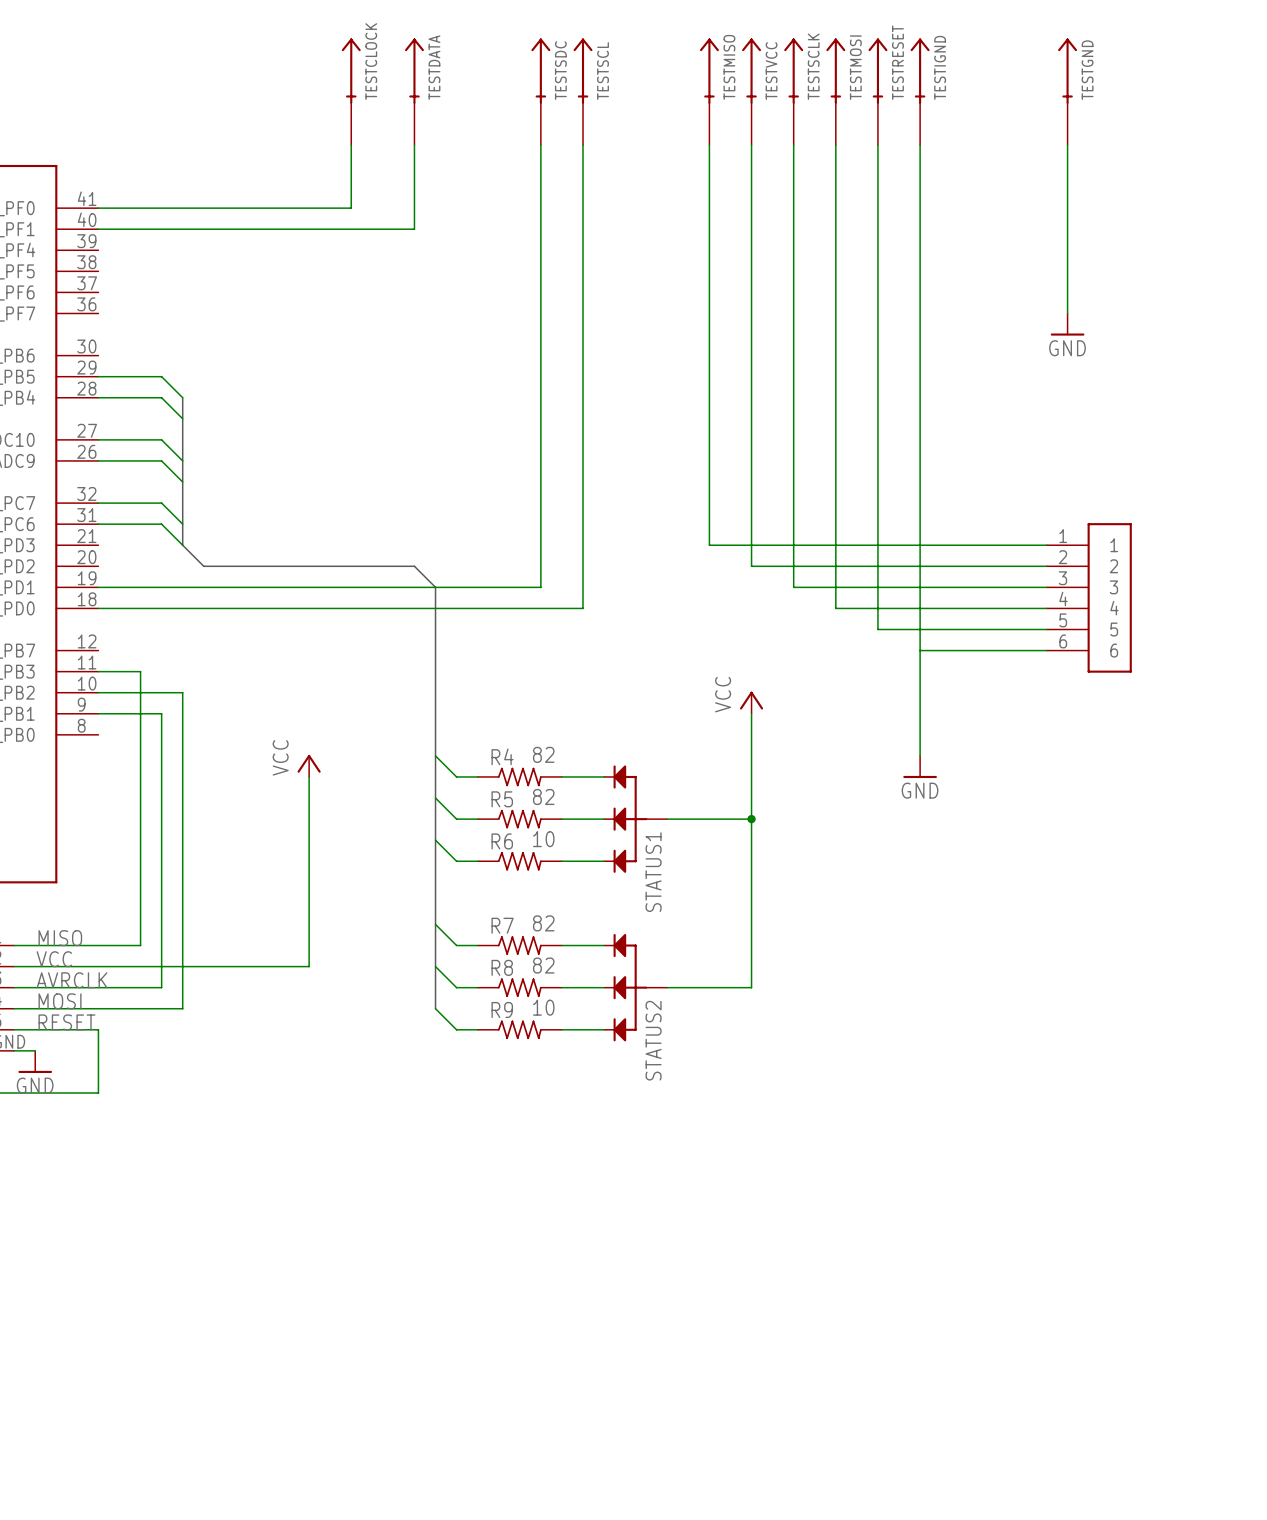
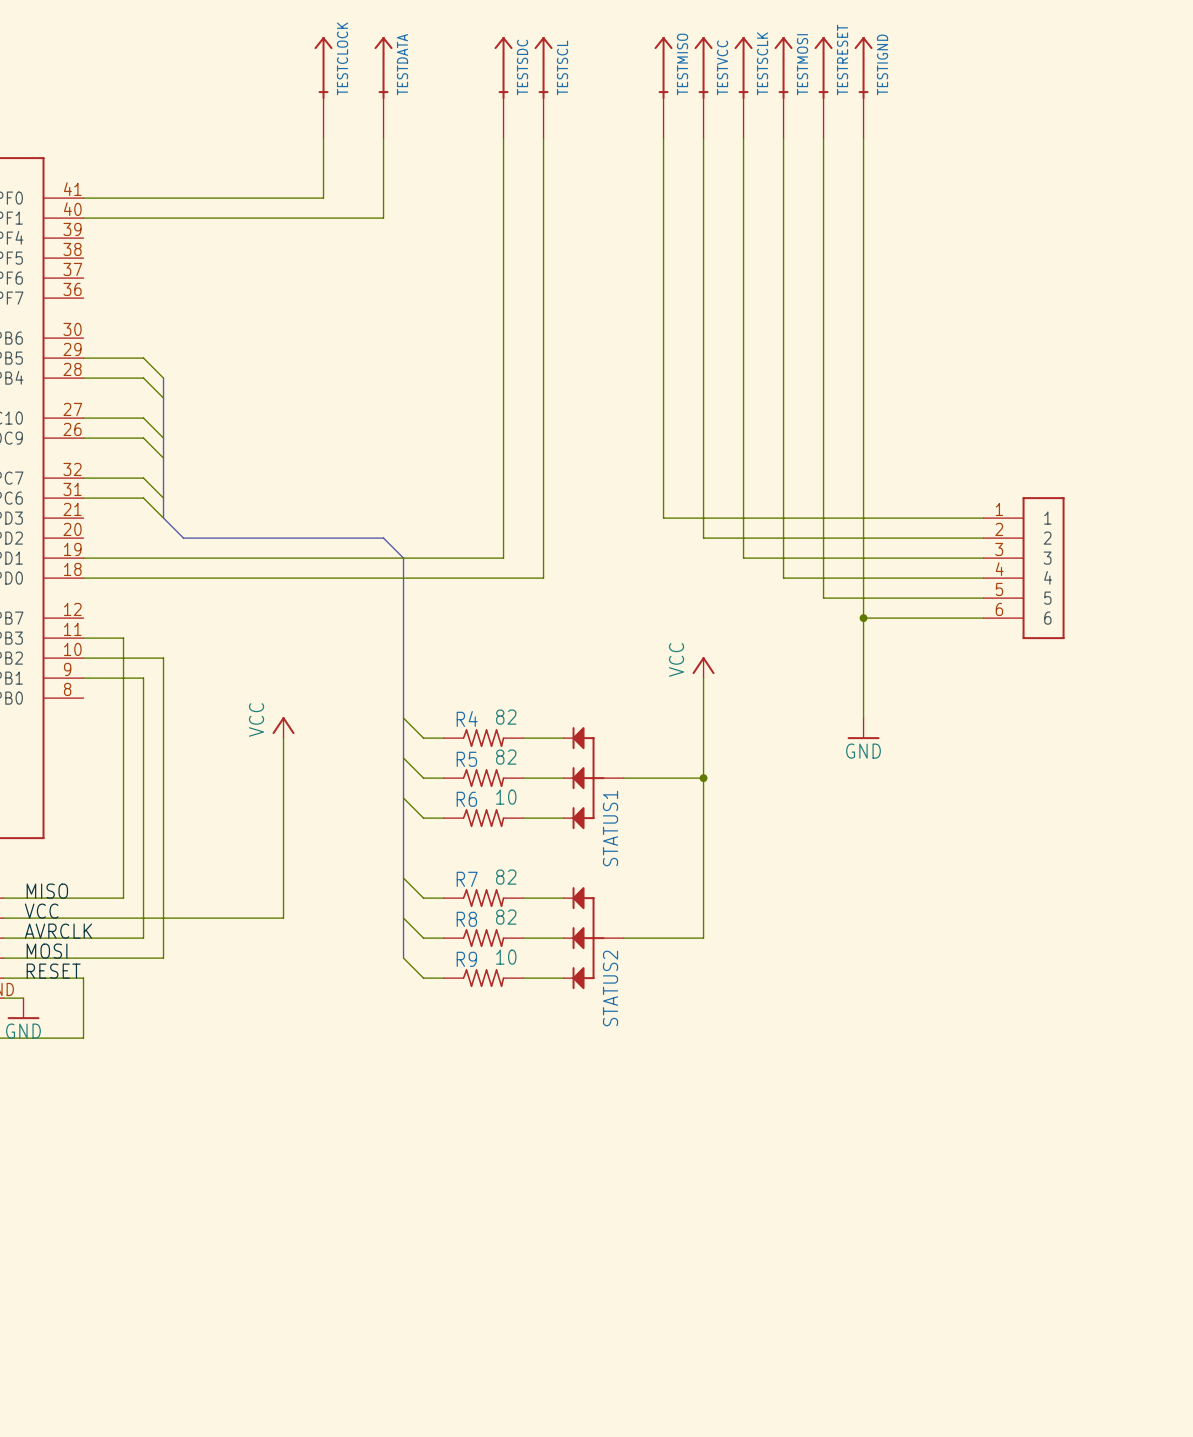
TESTGND: (1067, 91) -> none
wire: (1067, 144) (1067, 313) -> none
power symbol: GND (1067, 324) -> none
junction: none -> (863, 618)

